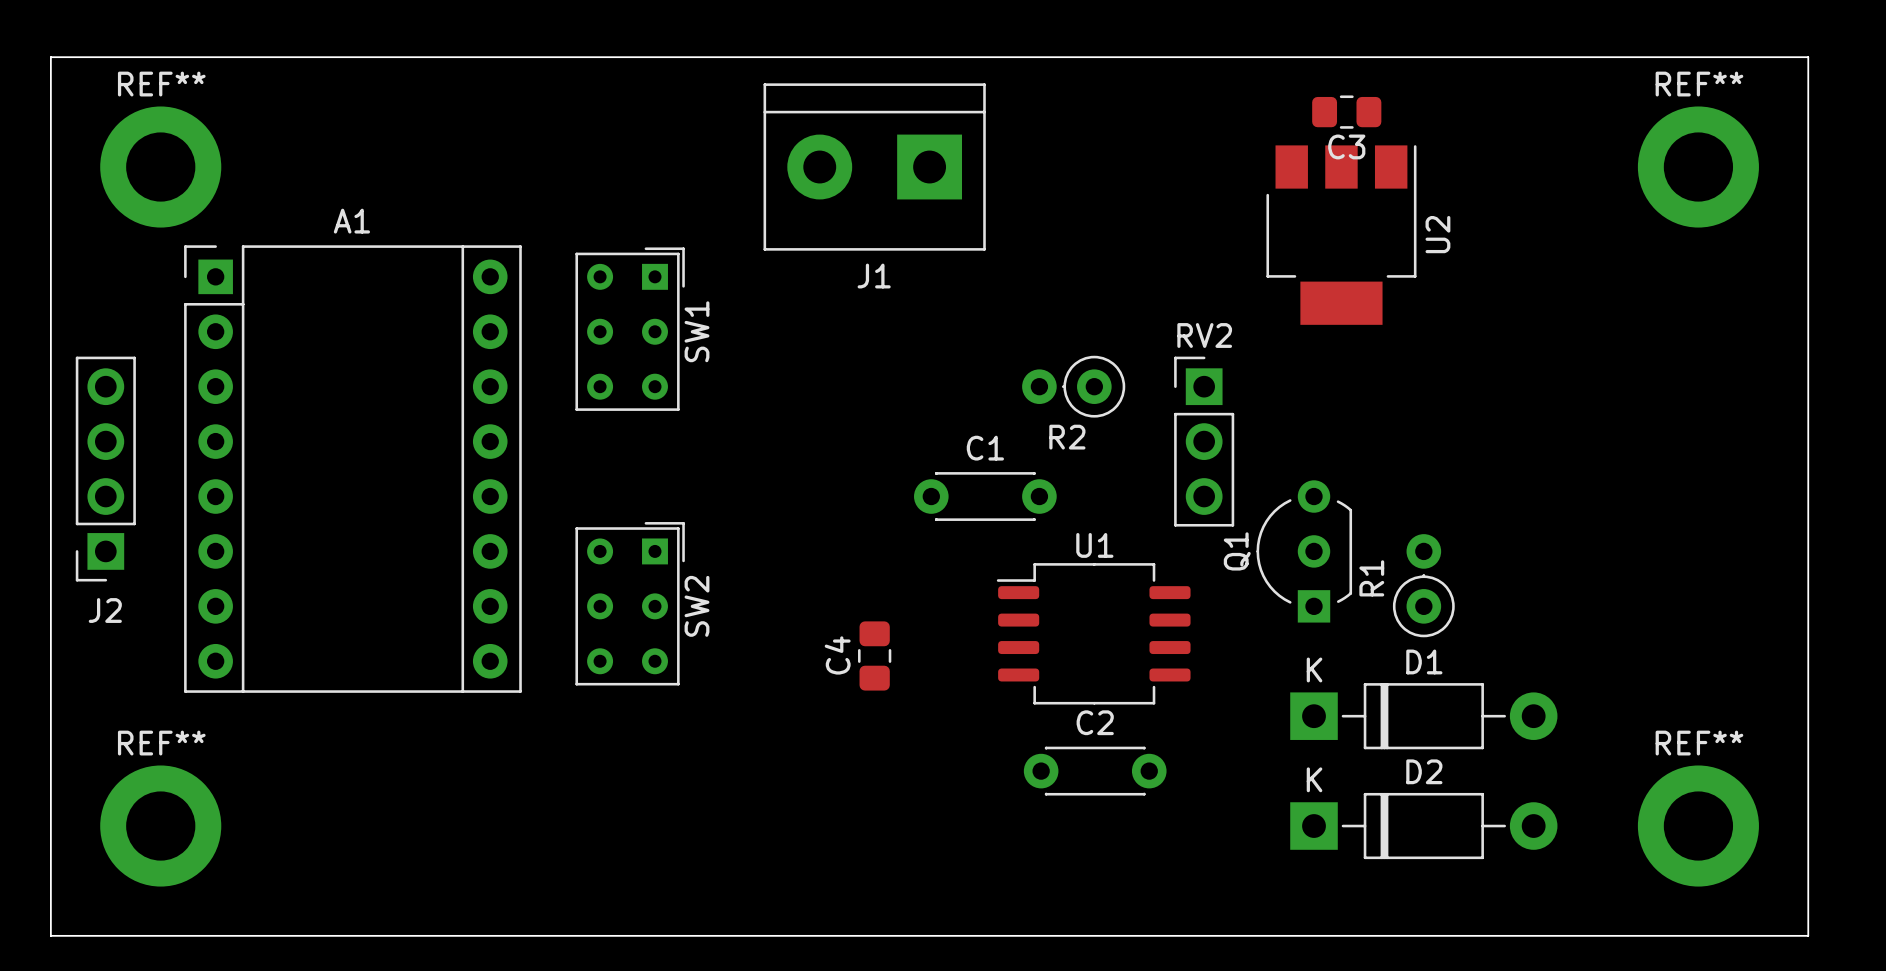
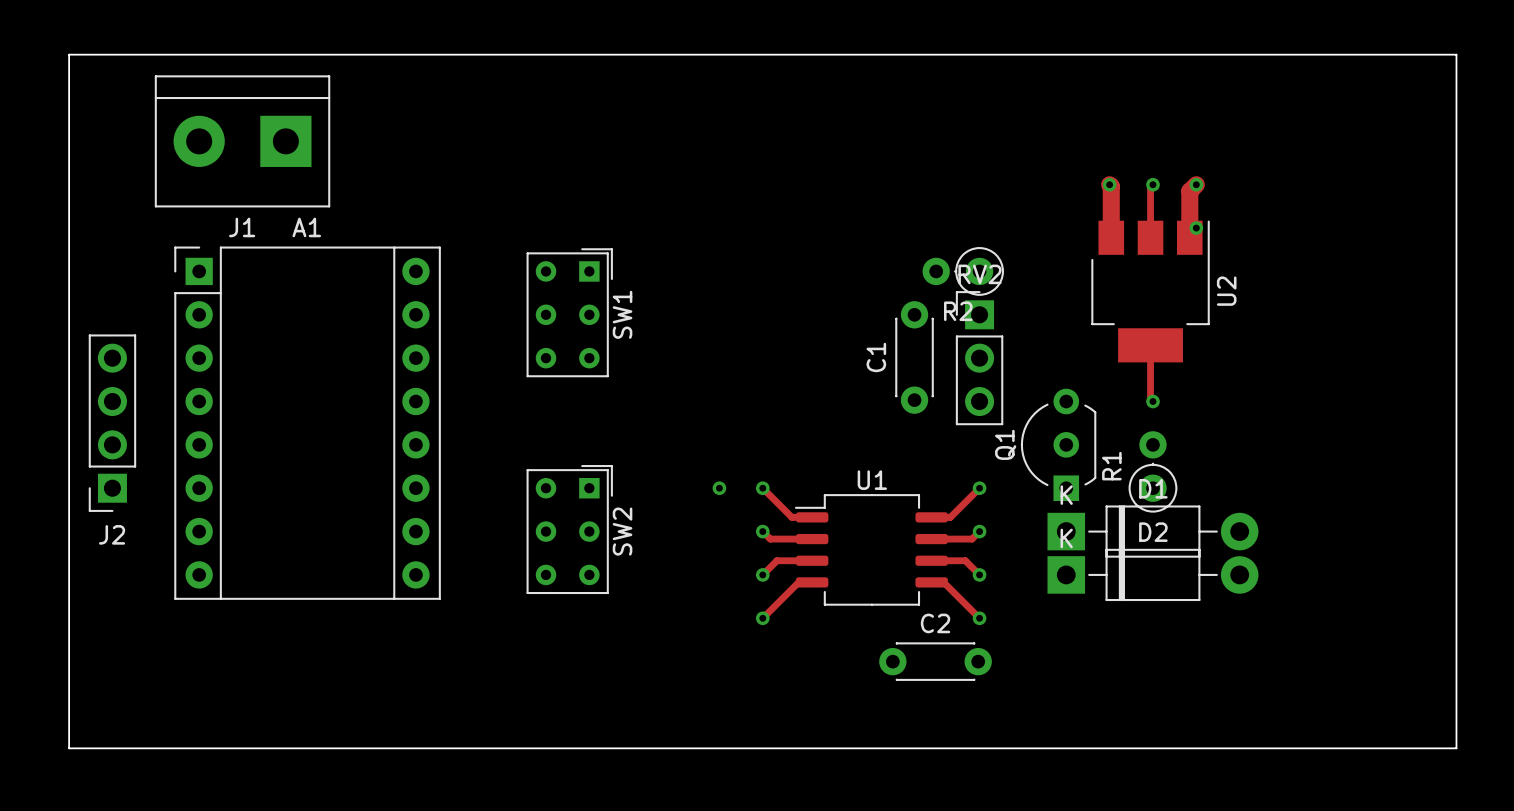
C3: (1346, 112) -> none
REF**: (160, 167) -> none
J1 position: (874, 167) -> (242, 141)
REF**: (1698, 167) -> none
track: none -> (1109, 184) (1111, 186) (1111, 237)
via: none -> (1109, 184)
track: none -> (1152, 184) (1150, 187) (1150, 237)
via: none -> (1152, 184)
track: none -> (1196, 184) (1189, 191) (1189, 237)
via: none -> (1196, 184)
U2 position: (1341, 235) -> (1150, 291)
via: none -> (1196, 228)
SW1 position: (630, 329) -> (569, 312)
R2 position: (1073, 386) -> (963, 271)
track: none -> (1150, 345) (1150, 399) (1152, 401)
C1 name position: C1 (985, 448) -> C1 (876, 357)
J2 position: (105, 469) -> (112, 423)
A1 position: (352, 469) -> (307, 423)
C1 rotation: 0° (985, 496) -> 90° clockwise (914, 357)
C1 position: (985, 496) -> (914, 357)
via: none -> (1152, 401)
SW2 position: (630, 603) -> (569, 529)
via: none -> (719, 488)
track: none -> (762, 488) (791, 517) (812, 517)
via: none -> (762, 488)
track: none -> (979, 488) (950, 517) (931, 517)
via: none -> (979, 488)
U1 position: (1093, 633) -> (871, 549)
C4: (874, 655) -> none
track: none -> (762, 531) (770, 539) (812, 539)
via: none -> (762, 531)
track: none -> (979, 531) (972, 539) (931, 539)
via: none -> (979, 531)
D1: none -> (1152, 531)
D1 name: D1 (1424, 661) -> D2 (1153, 532)
track: none -> (812, 560) (776, 560) (762, 574)
track: none -> (931, 560) (965, 560) (979, 574)
via: none -> (762, 574)
via: none -> (979, 574)
track: none -> (812, 582) (798, 582) (762, 618)
track: none -> (931, 582) (943, 582) (979, 618)
via: none -> (762, 618)
C2 position: (1095, 771) -> (935, 661)
via: none -> (979, 618)
REF**: (160, 826) -> none
D2: (1423, 826) -> none
REF**: (1698, 826) -> none

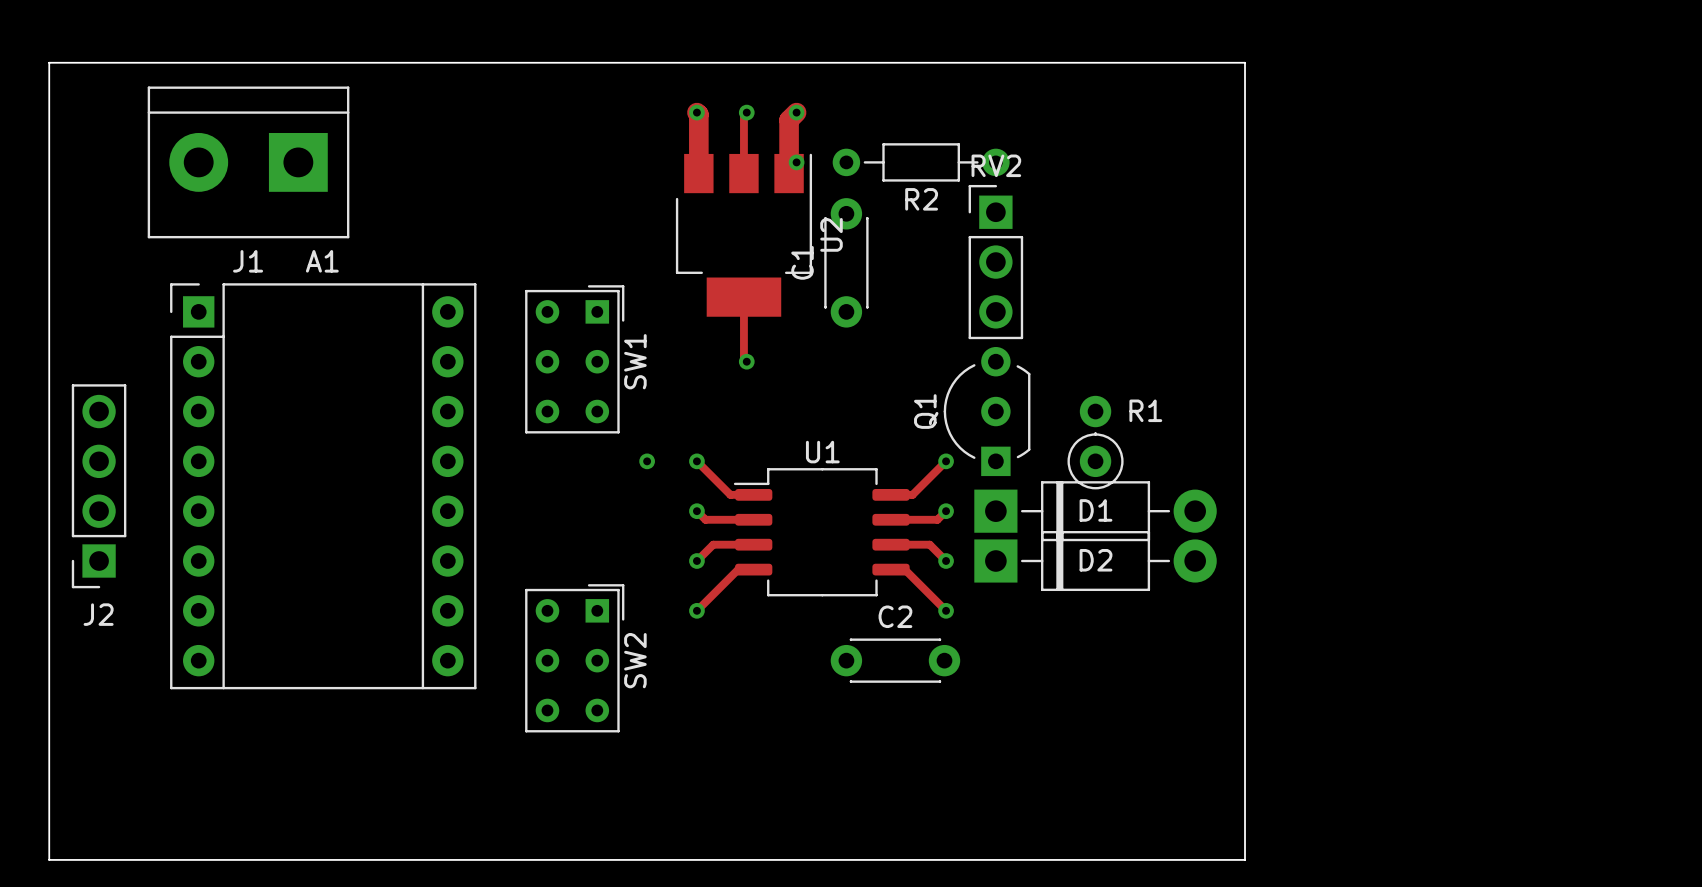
board edge: (1109, 54) (1456, 54) (1456, 748) (1109, 748) -> (1245, 62) (1245, 859)
track: none -> (696, 112) (698, 114) (698, 173)
via: none -> (696, 112)
track: none -> (746, 112) (743, 115) (743, 173)
via: none -> (746, 112)
track: none -> (796, 112) (789, 120) (789, 173)
via: none -> (796, 112)
via: none -> (796, 162)
track: (1109, 184) (1111, 186) (1111, 237) -> none
via: (1109, 184) -> none
track: (1152, 184) (1150, 187) (1150, 237) -> none
via: (1152, 184) -> none
track: (1196, 184) (1189, 191) (1189, 237) -> none
via: (1196, 184) -> none
via: (1196, 228) -> none
R2 footprint: [922, 247, 1004, 296] -> [832, 143, 1010, 182]
track: none -> (743, 297) (743, 358) (746, 361)
U2 position: (1150, 291) -> (743, 235)
SW1 position: (569, 312) -> (574, 359)
via: none -> (746, 361)
track: (1150, 345) (1150, 399) (1152, 401) -> none
C1 position: (914, 357) -> (846, 262)
RV2 position: (979, 358) -> (995, 262)
via: none -> (647, 461)
via: none -> (696, 461)
via: none -> (946, 461)
via: (1152, 401) -> none
via: none -> (696, 511)
via: none -> (946, 511)
Q1 position: (1058, 444) -> (987, 411)
R1 name rotation: 0° (1111, 466) -> 90° clockwise (1145, 410)
R1 name position: R1 (1111, 466) -> R1 (1145, 410)
R1 position: (1152, 471) -> (1095, 442)
via: none -> (696, 561)
via: (719, 488) -> none
track: (762, 488) (791, 517) (812, 517) -> (696, 461) (730, 494) (753, 494)
via: (762, 488) -> none
via: none -> (946, 561)
track: (979, 488) (950, 517) (931, 517) -> (946, 461) (912, 494) (891, 494)
via: (979, 488) -> none
D1 name position: D1 (1153, 488) -> D1 (1096, 510)
D1 text: K (1066, 495) -> none
SW2 position: (569, 529) -> (574, 658)
via: none -> (696, 610)
track: (762, 531) (770, 539) (812, 539) -> (696, 511) (705, 519) (753, 519)
via: (762, 531) -> none
via: none -> (946, 610)
track: (979, 531) (972, 539) (931, 539) -> (946, 511) (937, 519) (891, 519)
via: (979, 531) -> none
D1 position: (1152, 531) -> (1095, 511)
D2 name position: D2 (1153, 532) -> D2 (1096, 560)
D2 text: K (1066, 538) -> none
U1 position: (871, 549) -> (821, 532)
track: (812, 560) (776, 560) (762, 574) -> (753, 544) (713, 544) (696, 561)
track: (931, 560) (965, 560) (979, 574) -> (891, 544) (929, 544) (946, 561)
via: (762, 574) -> none
via: (979, 574) -> none
D2 position: (1152, 574) -> (1095, 561)
track: (812, 582) (798, 582) (762, 618) -> (753, 569) (738, 569) (696, 610)
track: (931, 582) (943, 582) (979, 618) -> (891, 569) (904, 569) (946, 610)
via: (762, 618) -> none
via: (979, 618) -> none
C2 position: (935, 661) -> (895, 660)

